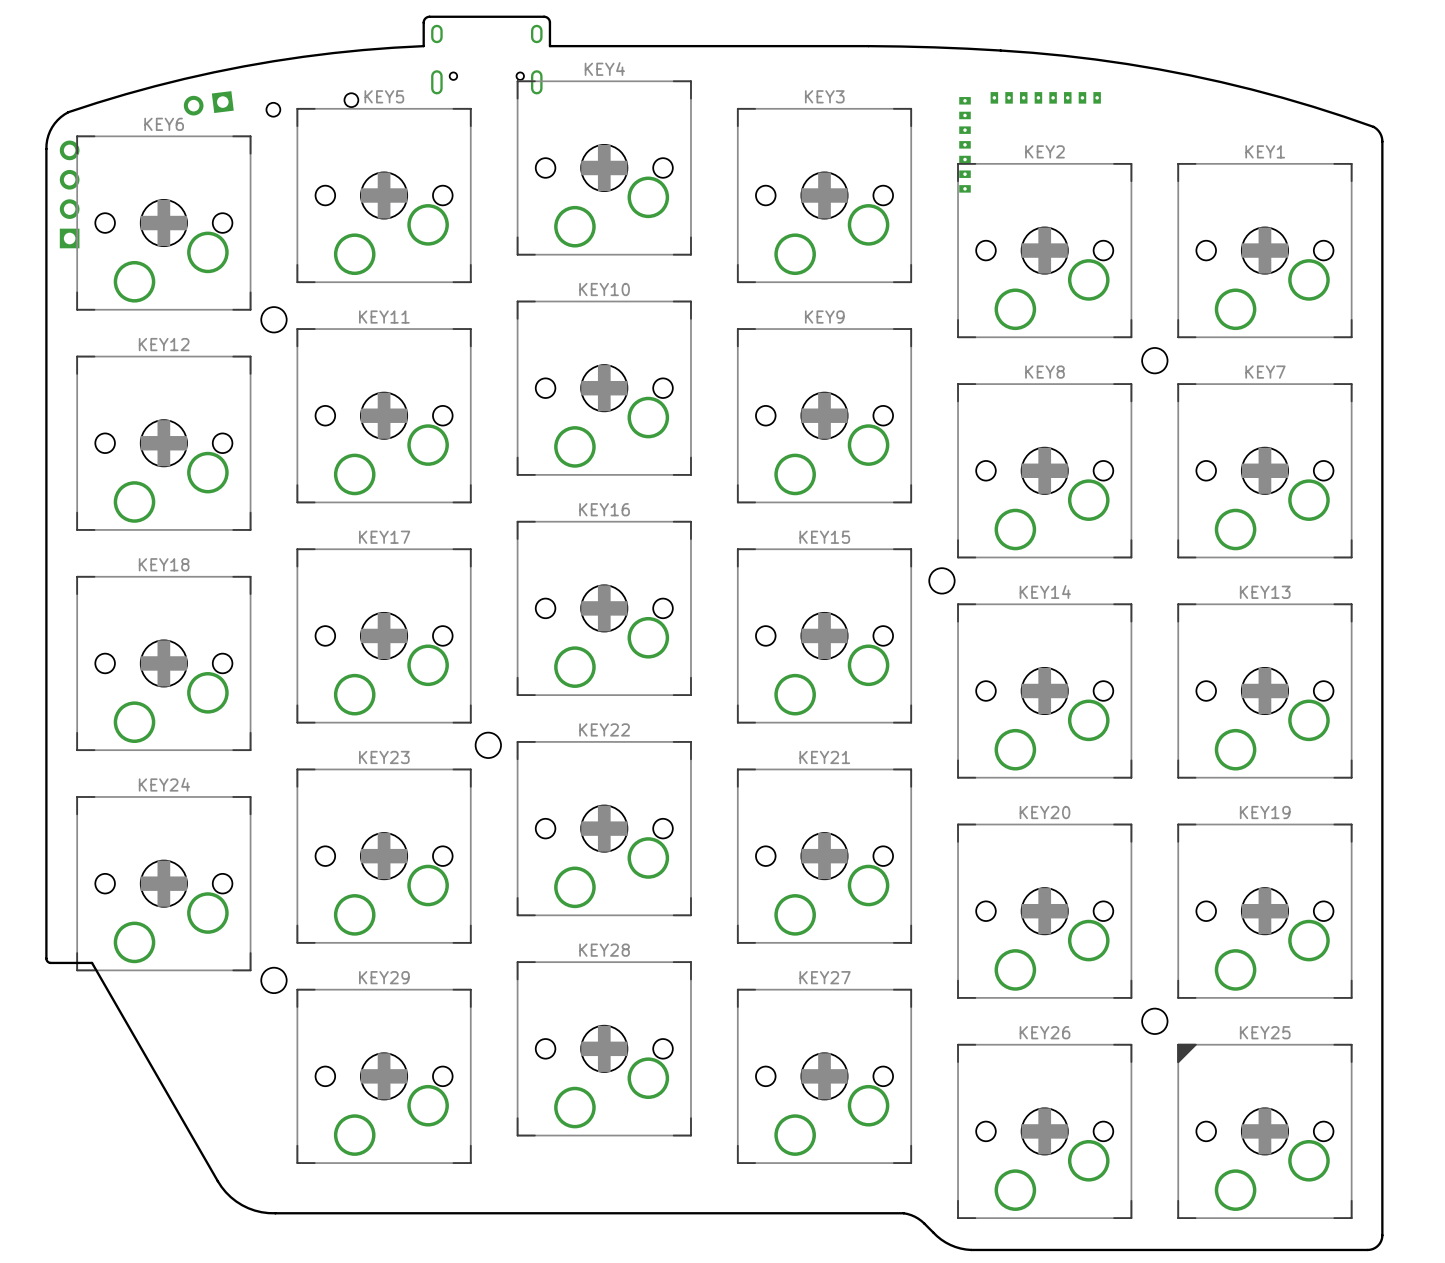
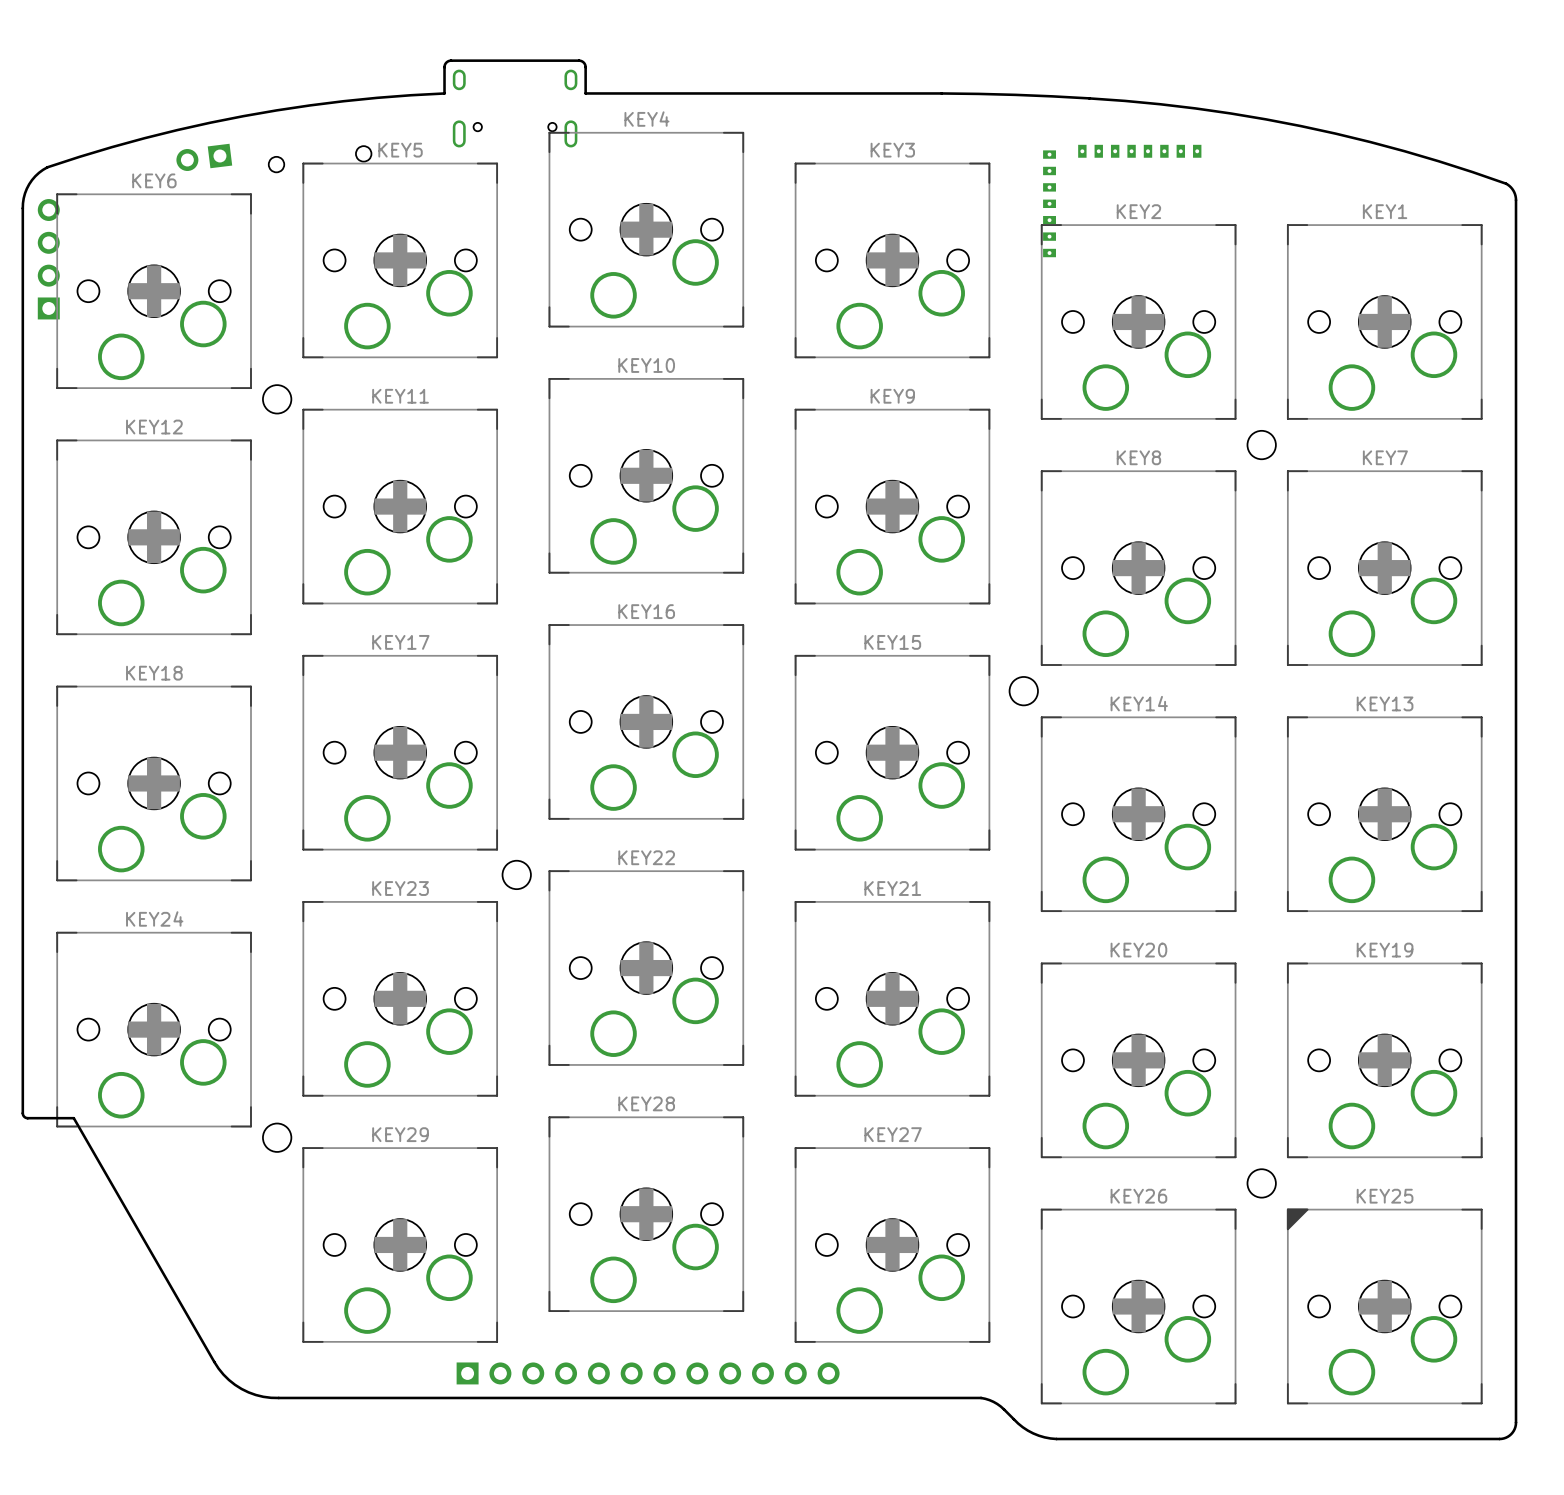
part: none -> (648, 1373)

